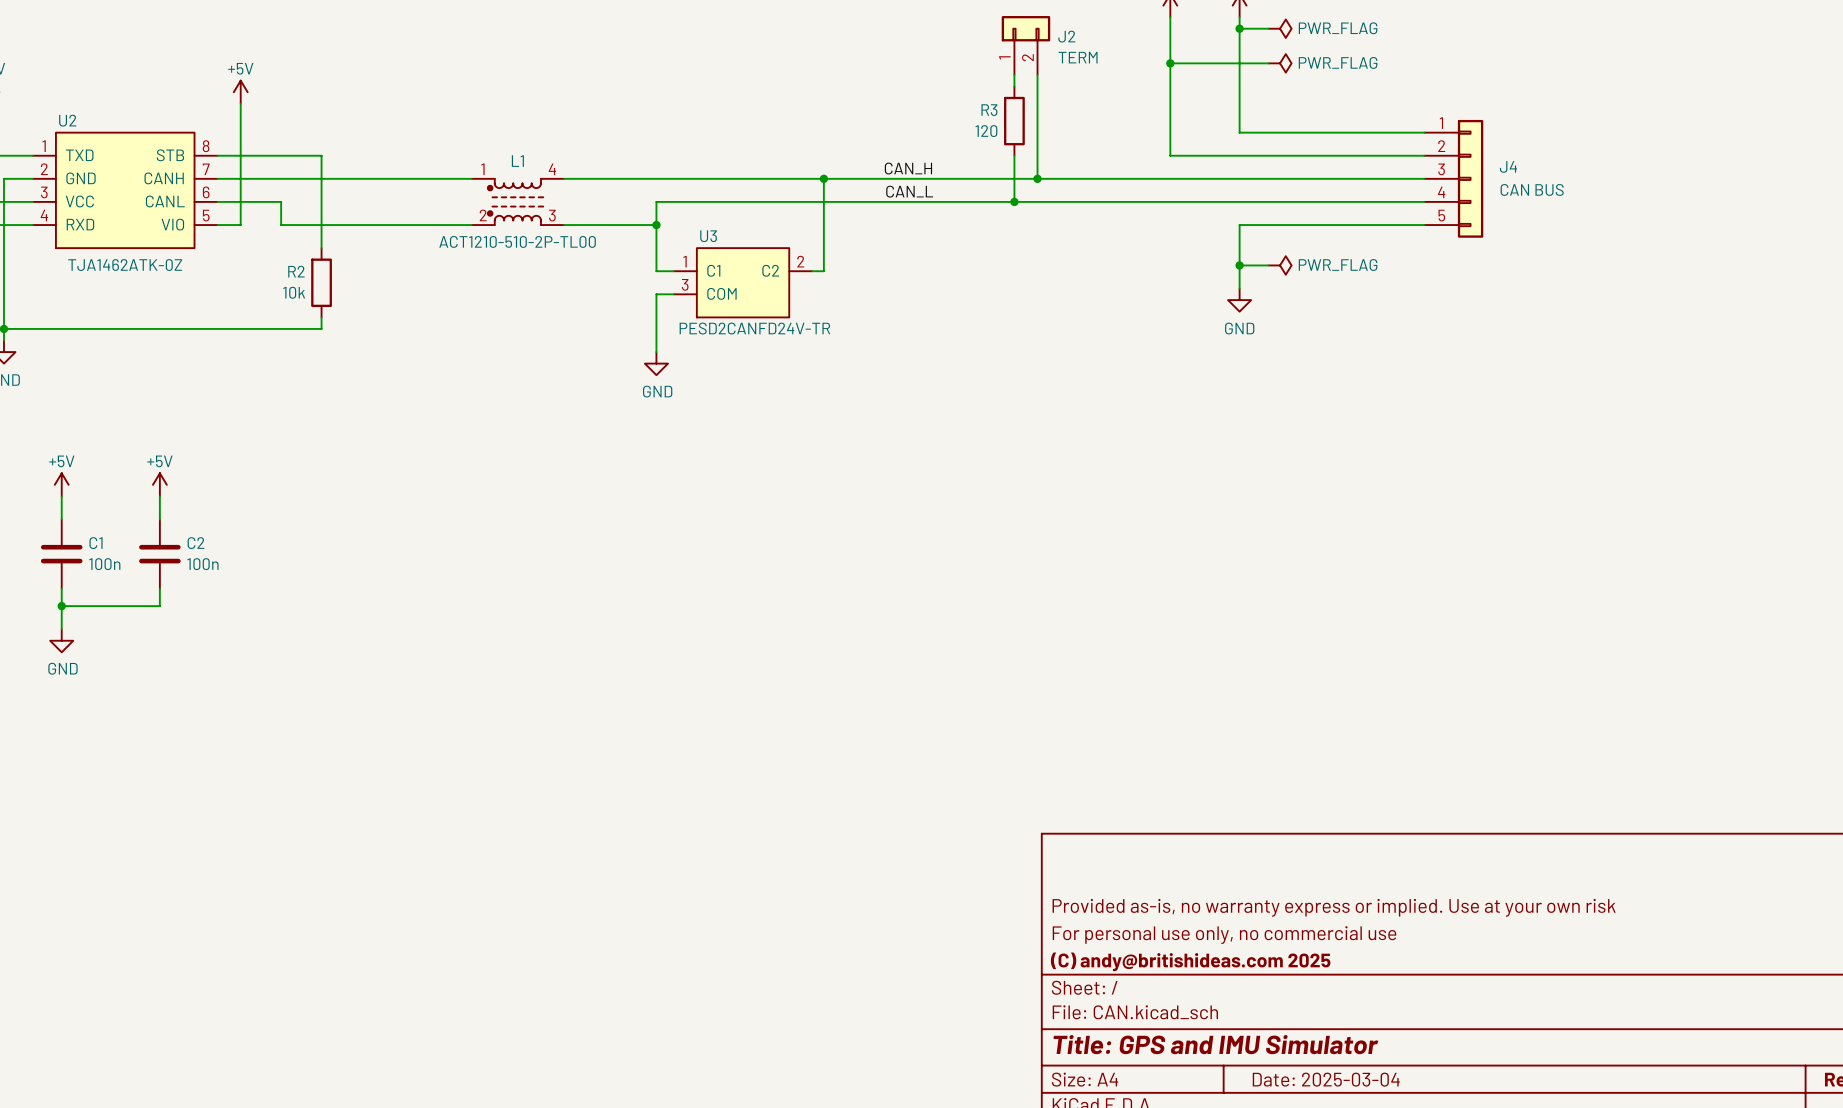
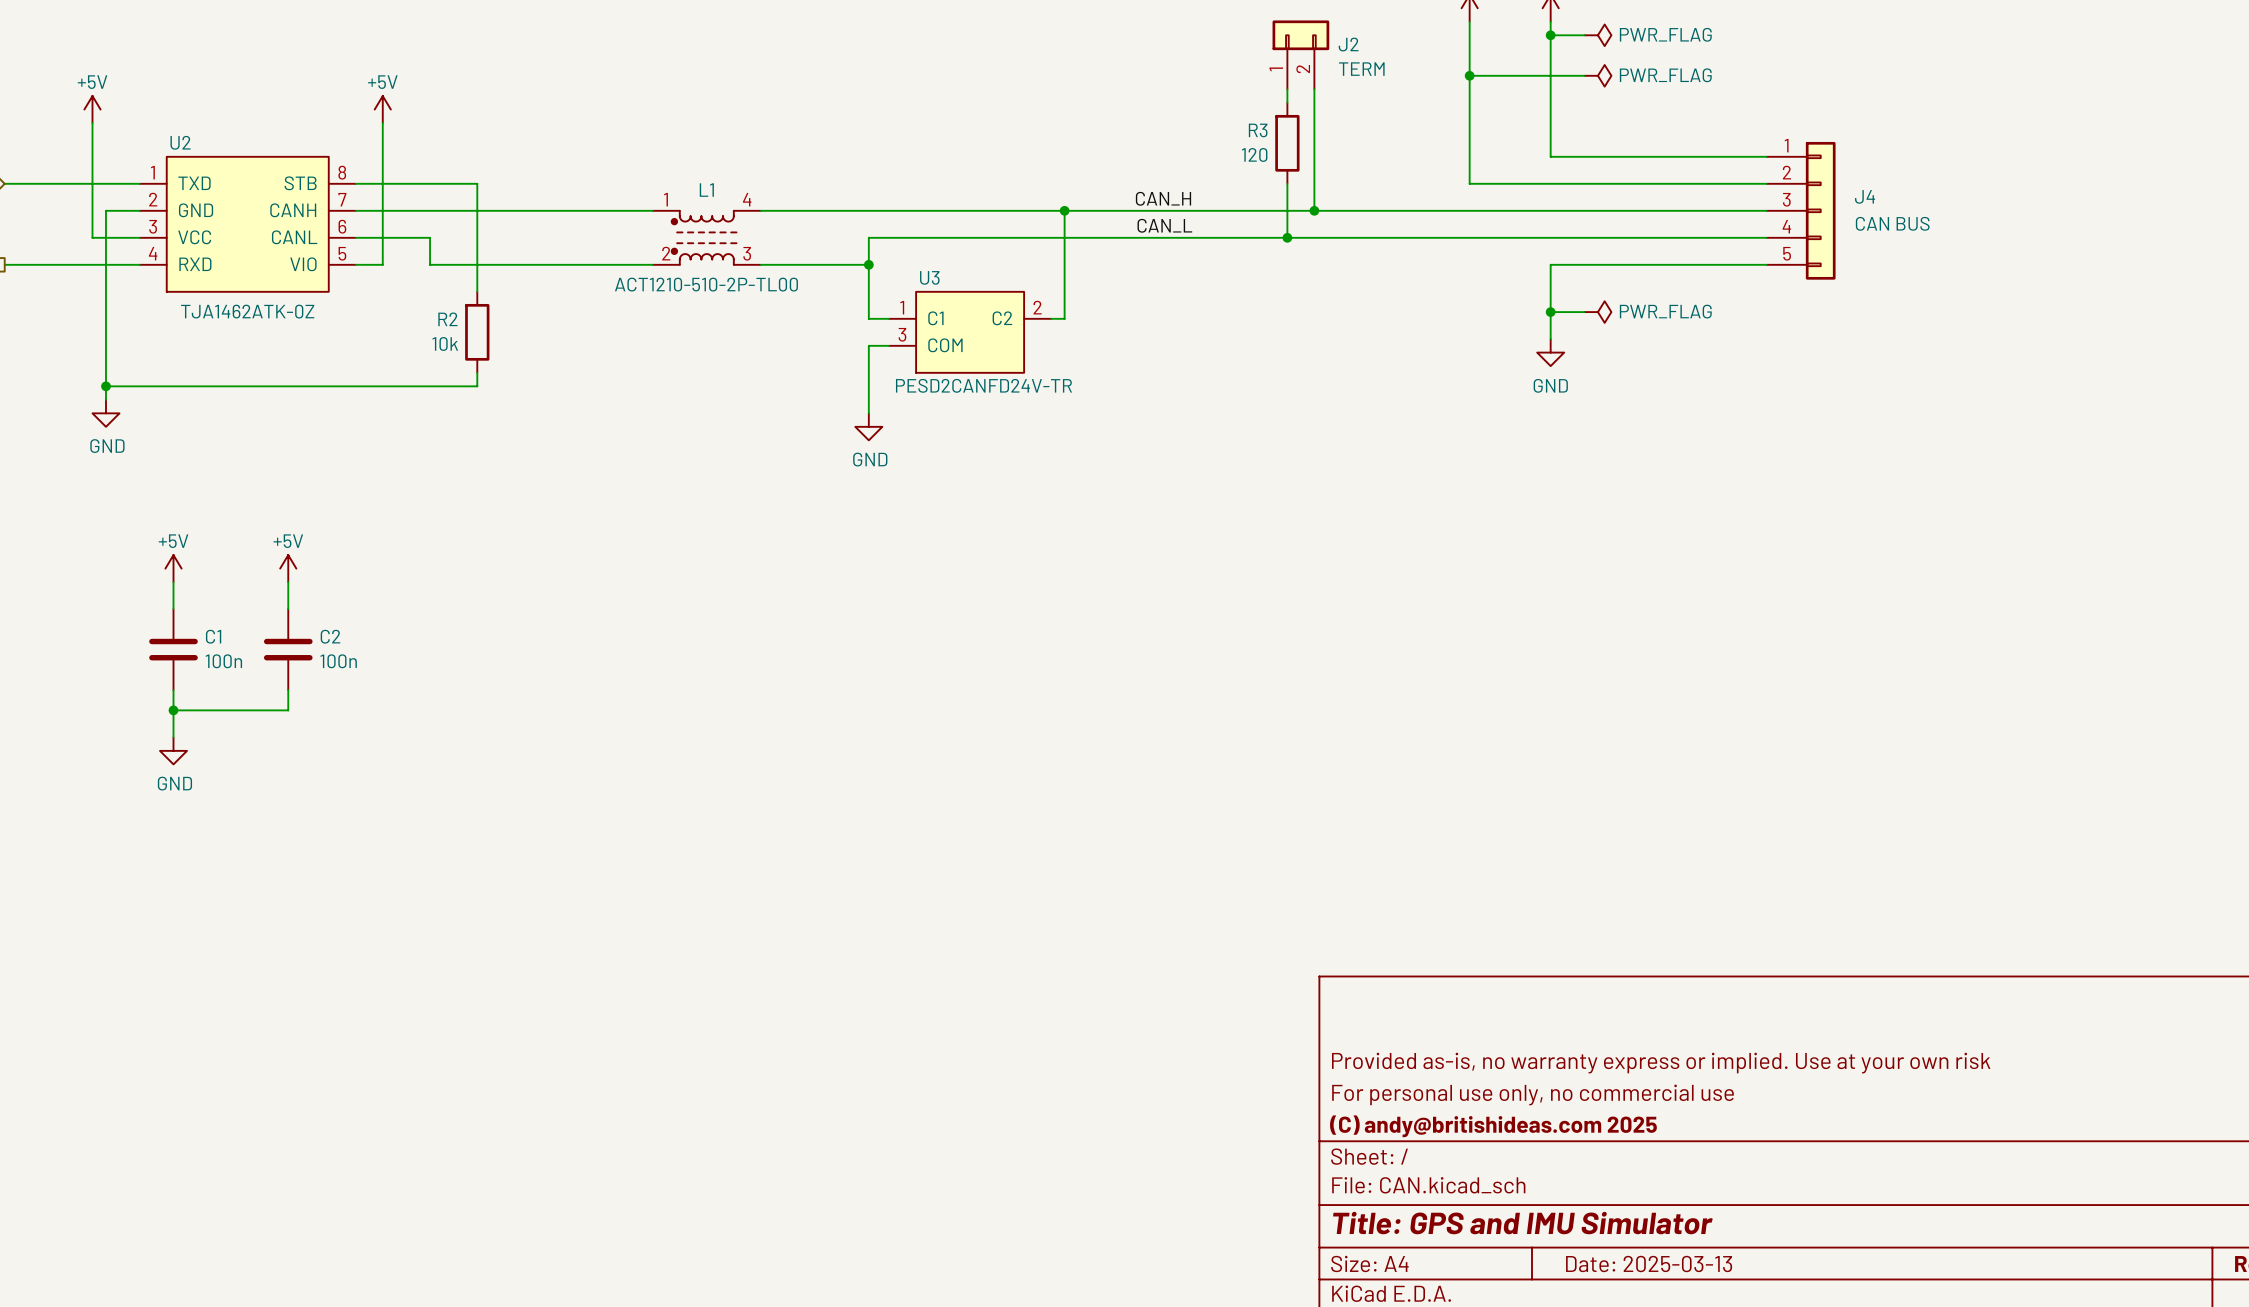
title block: Date: 2025-03-04 (1326, 1079) -> Date: 2025-03-13 (1649, 1264)

